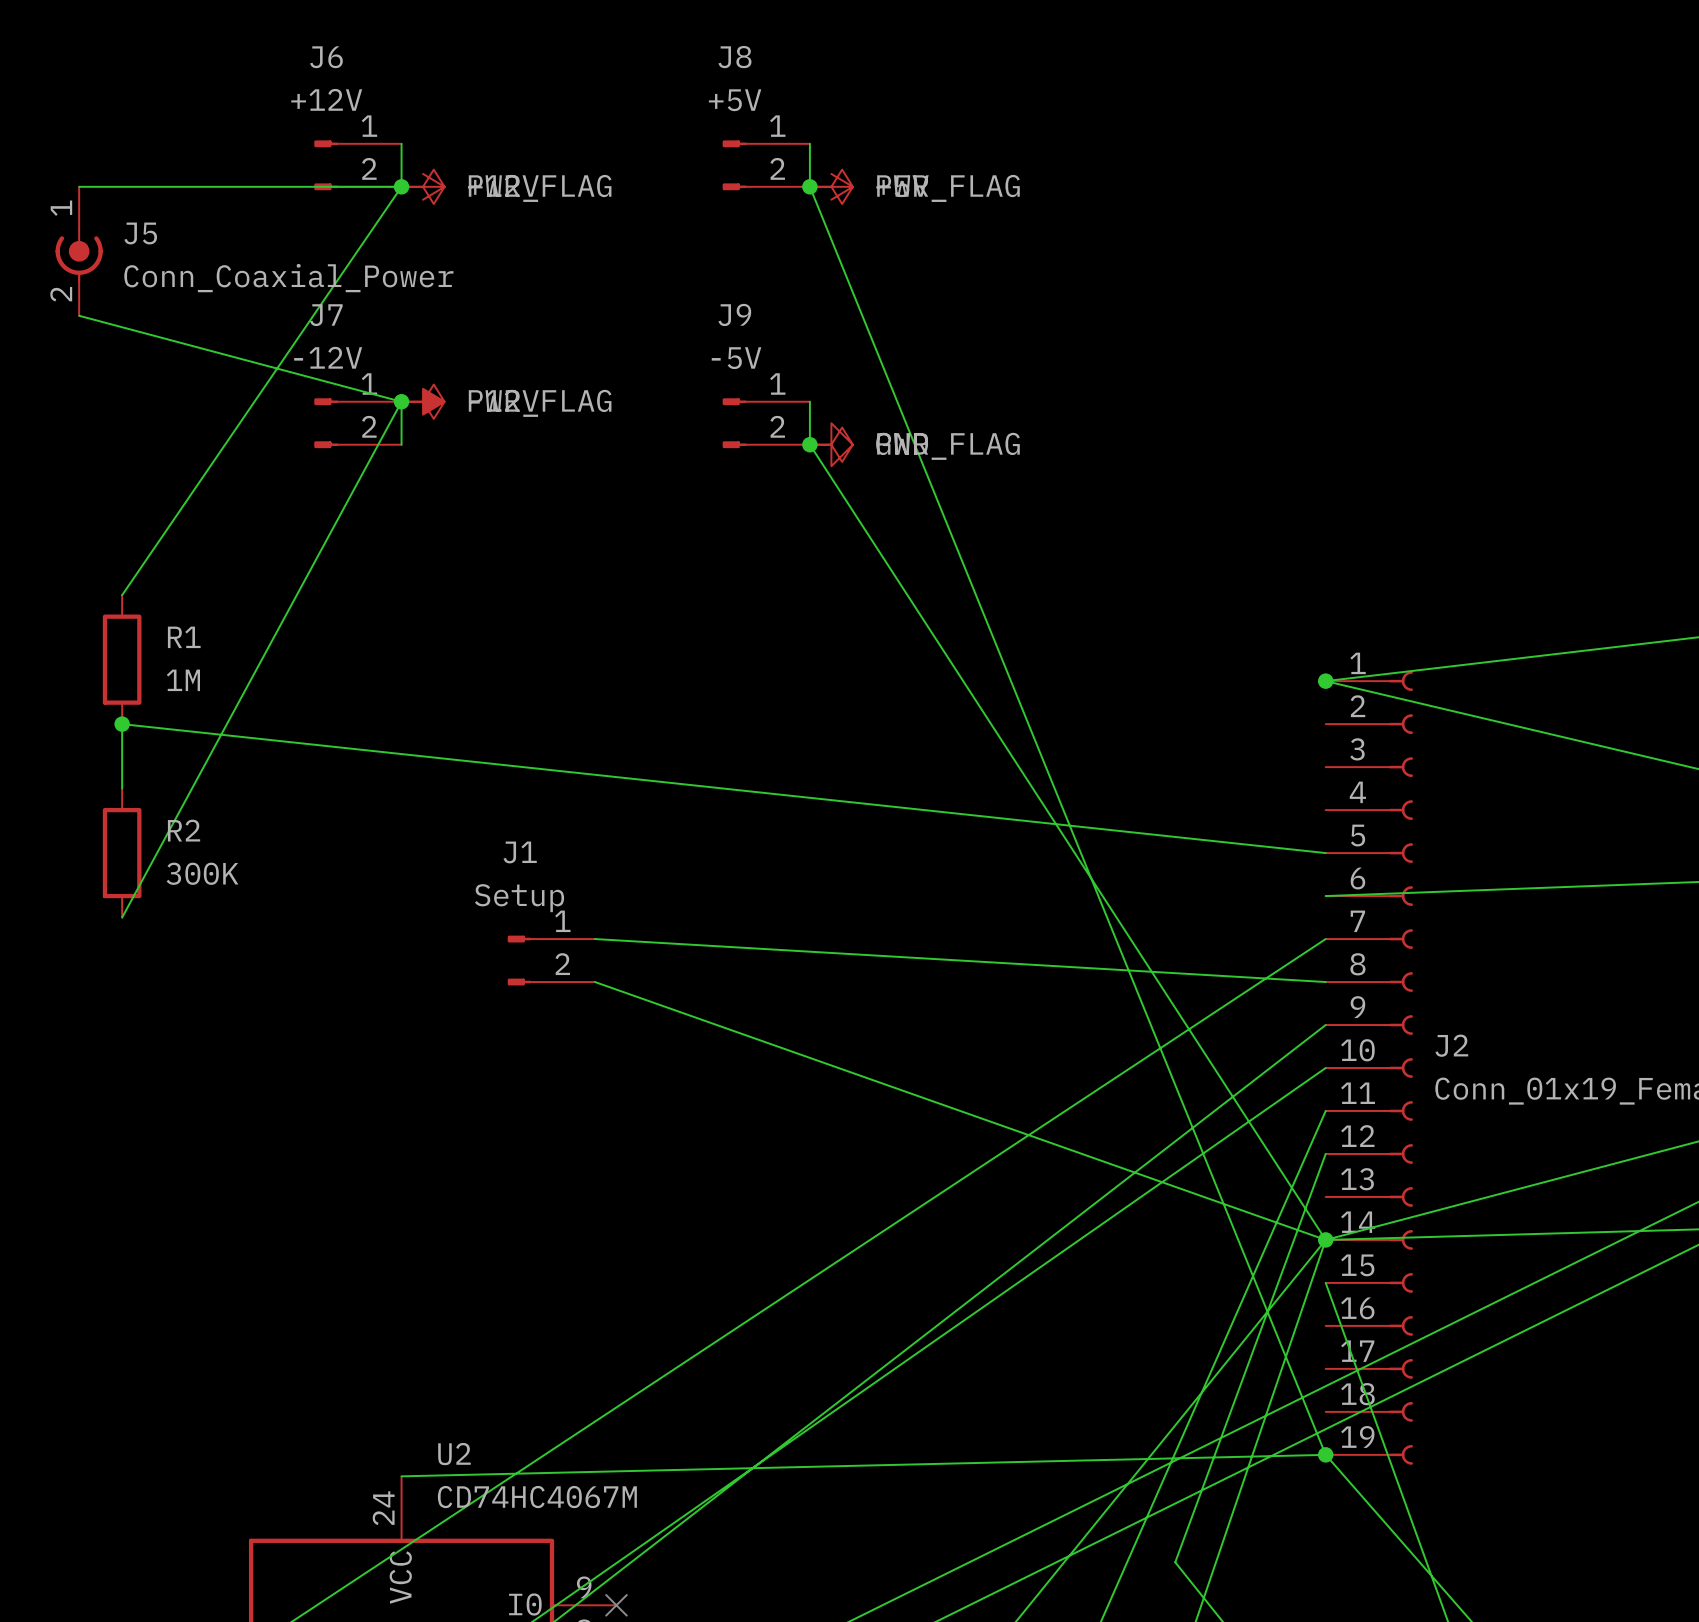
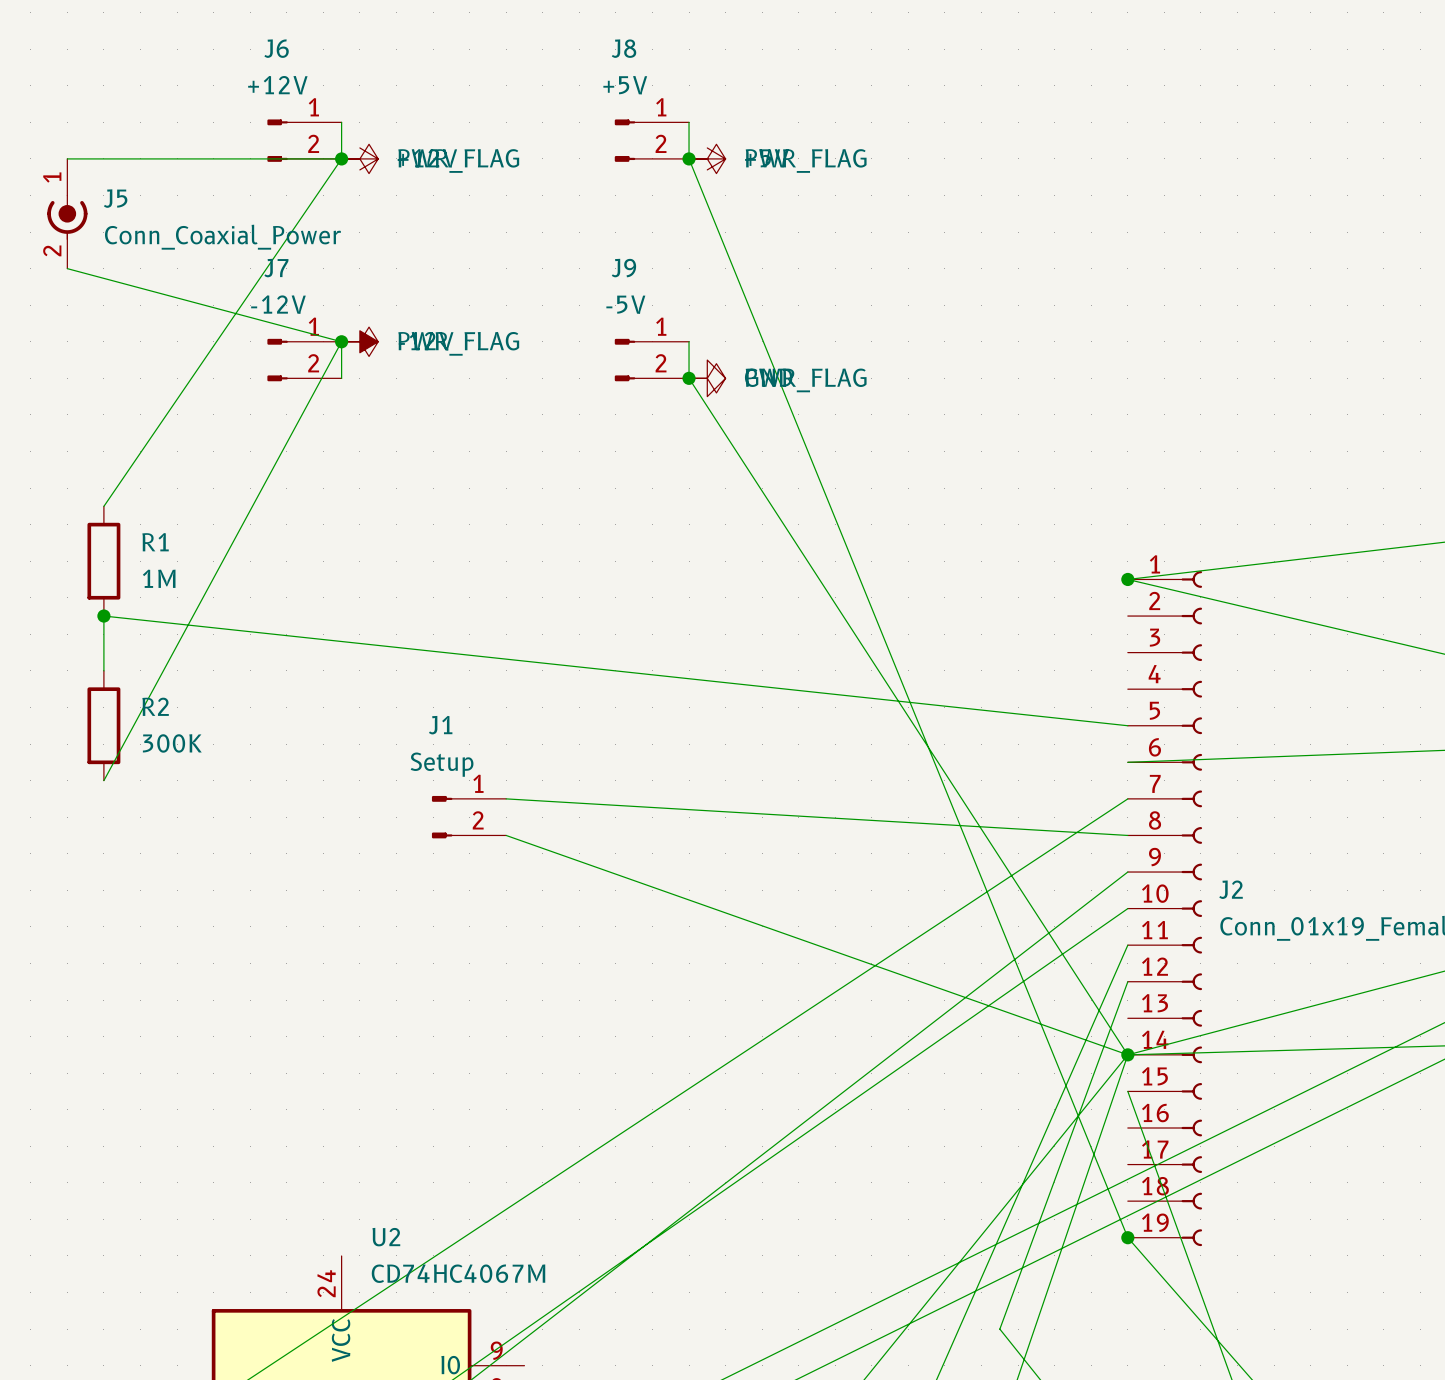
wire: (1325, 1454) (401, 1476) -> none
no-connect mark: (616, 1605) -> none

